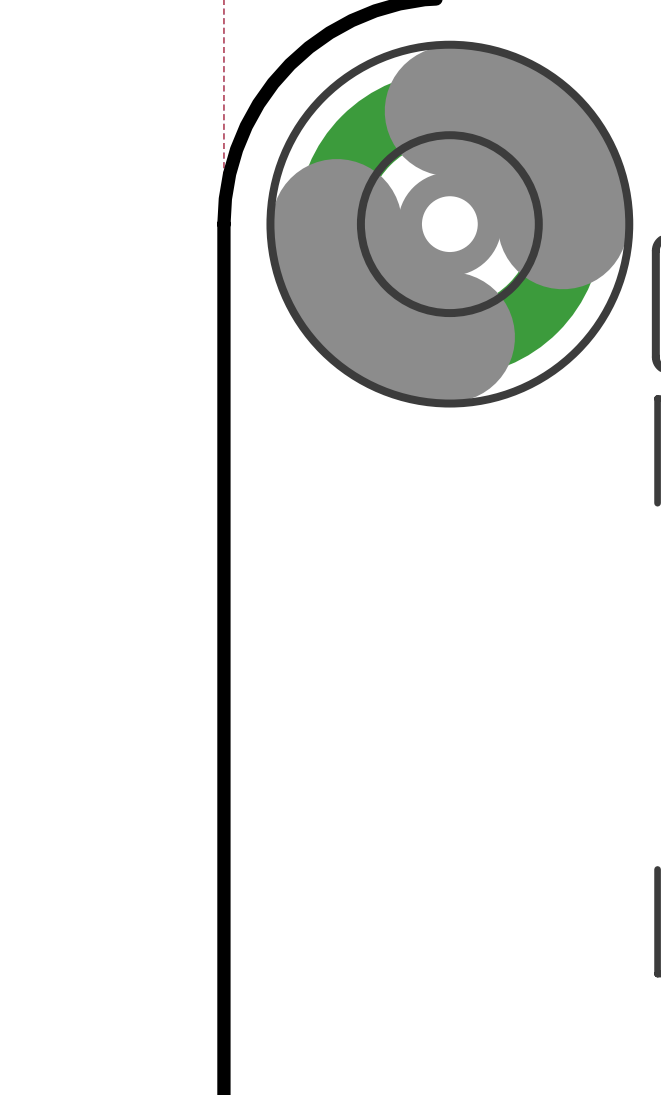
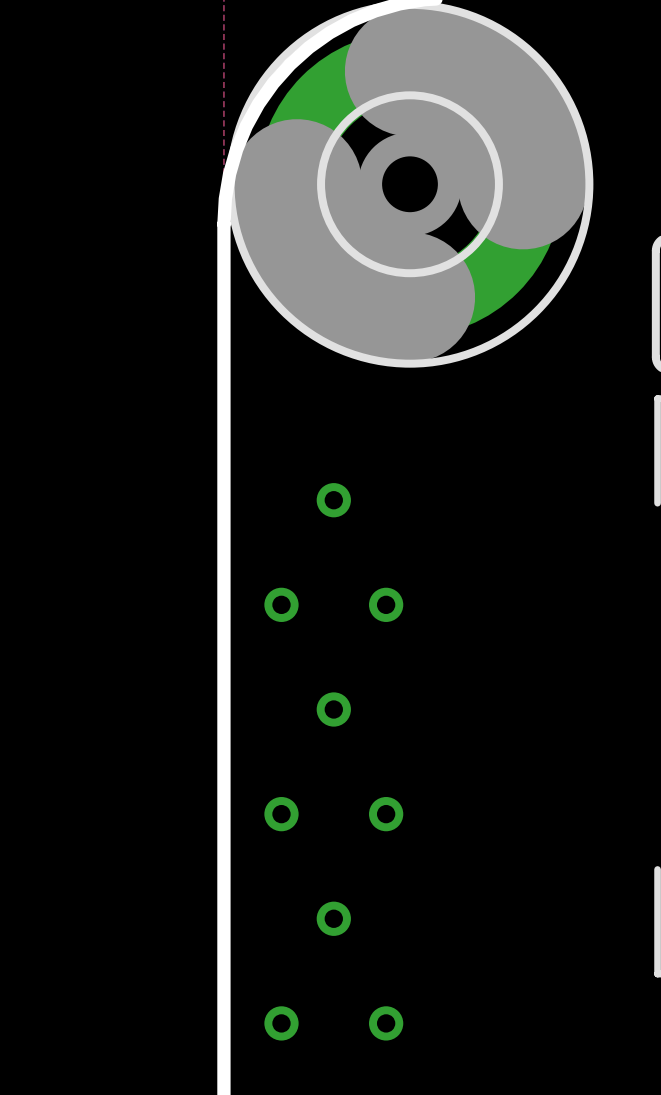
part position: (449, 224) -> (409, 184)
via: none -> (333, 500)
via: none -> (281, 604)
via: none -> (386, 604)
via: none -> (333, 709)
via: none -> (281, 814)
via: none -> (386, 814)
via: none -> (333, 918)
via: none -> (281, 1023)
via: none -> (386, 1023)

